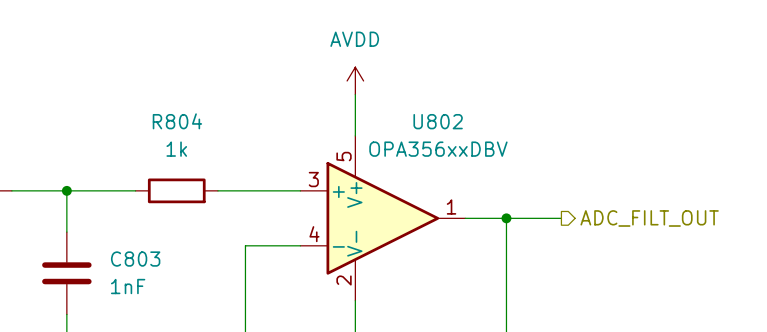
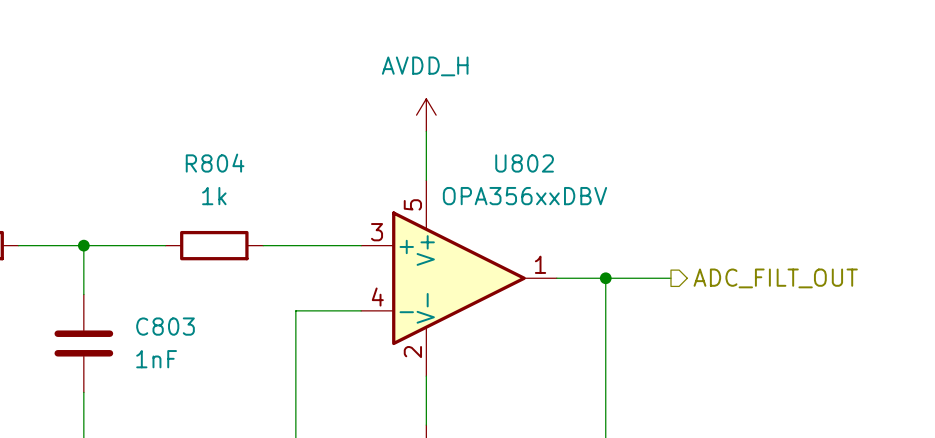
power symbol: AVDD (355, 80) -> AVDD_H (426, 115)

